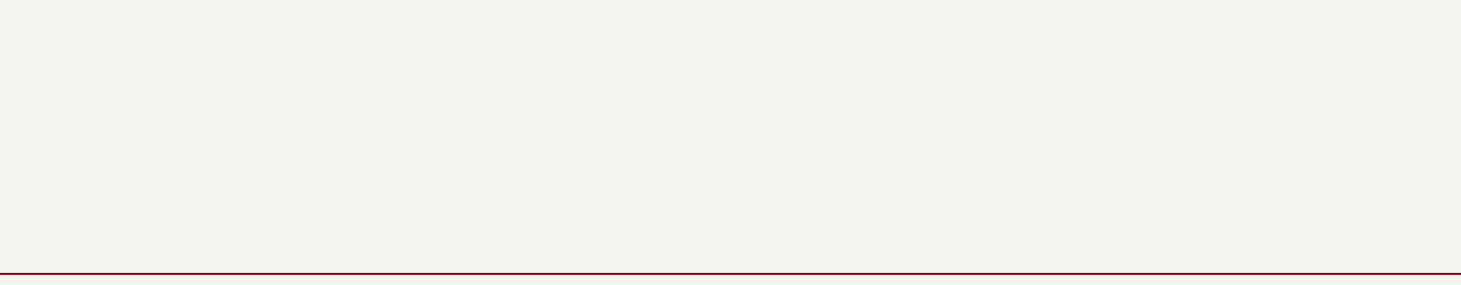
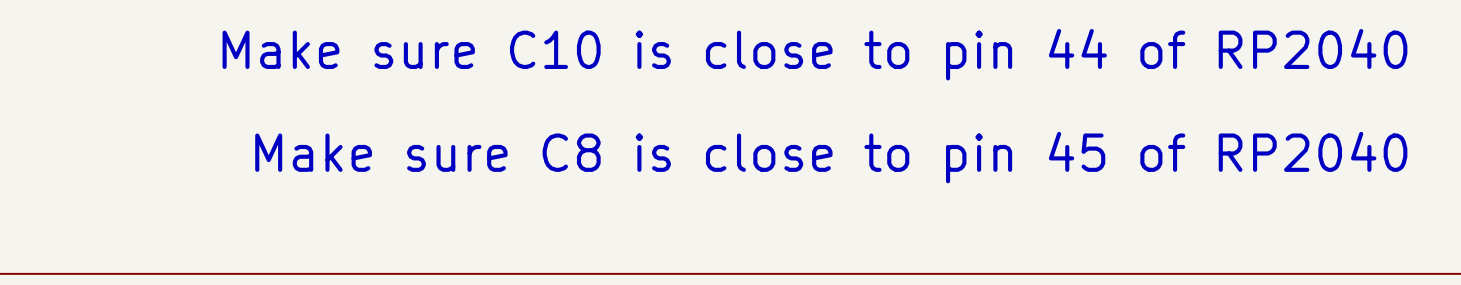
text: none -> Make sure C10 is close to pin 44 of RP2040 (814, 54)
text: none -> Make sure C8 is close to pin 45 of RP2040 (831, 157)

